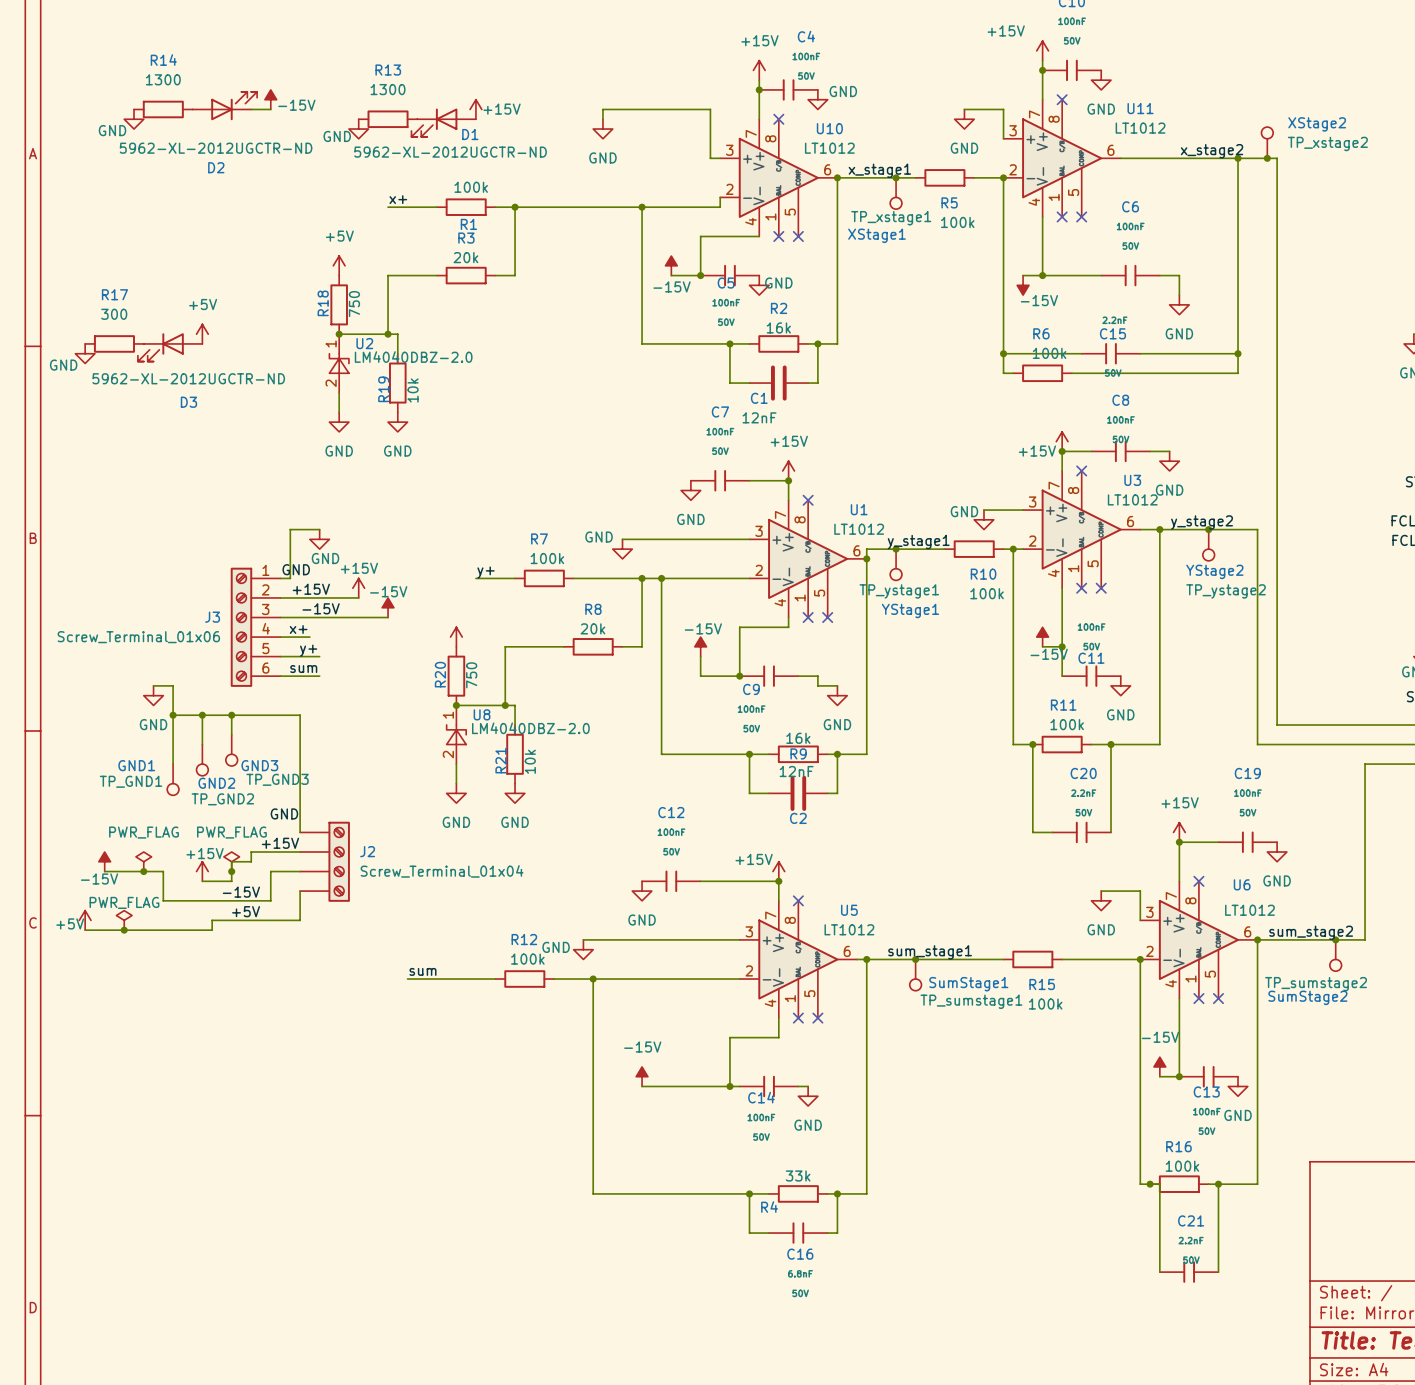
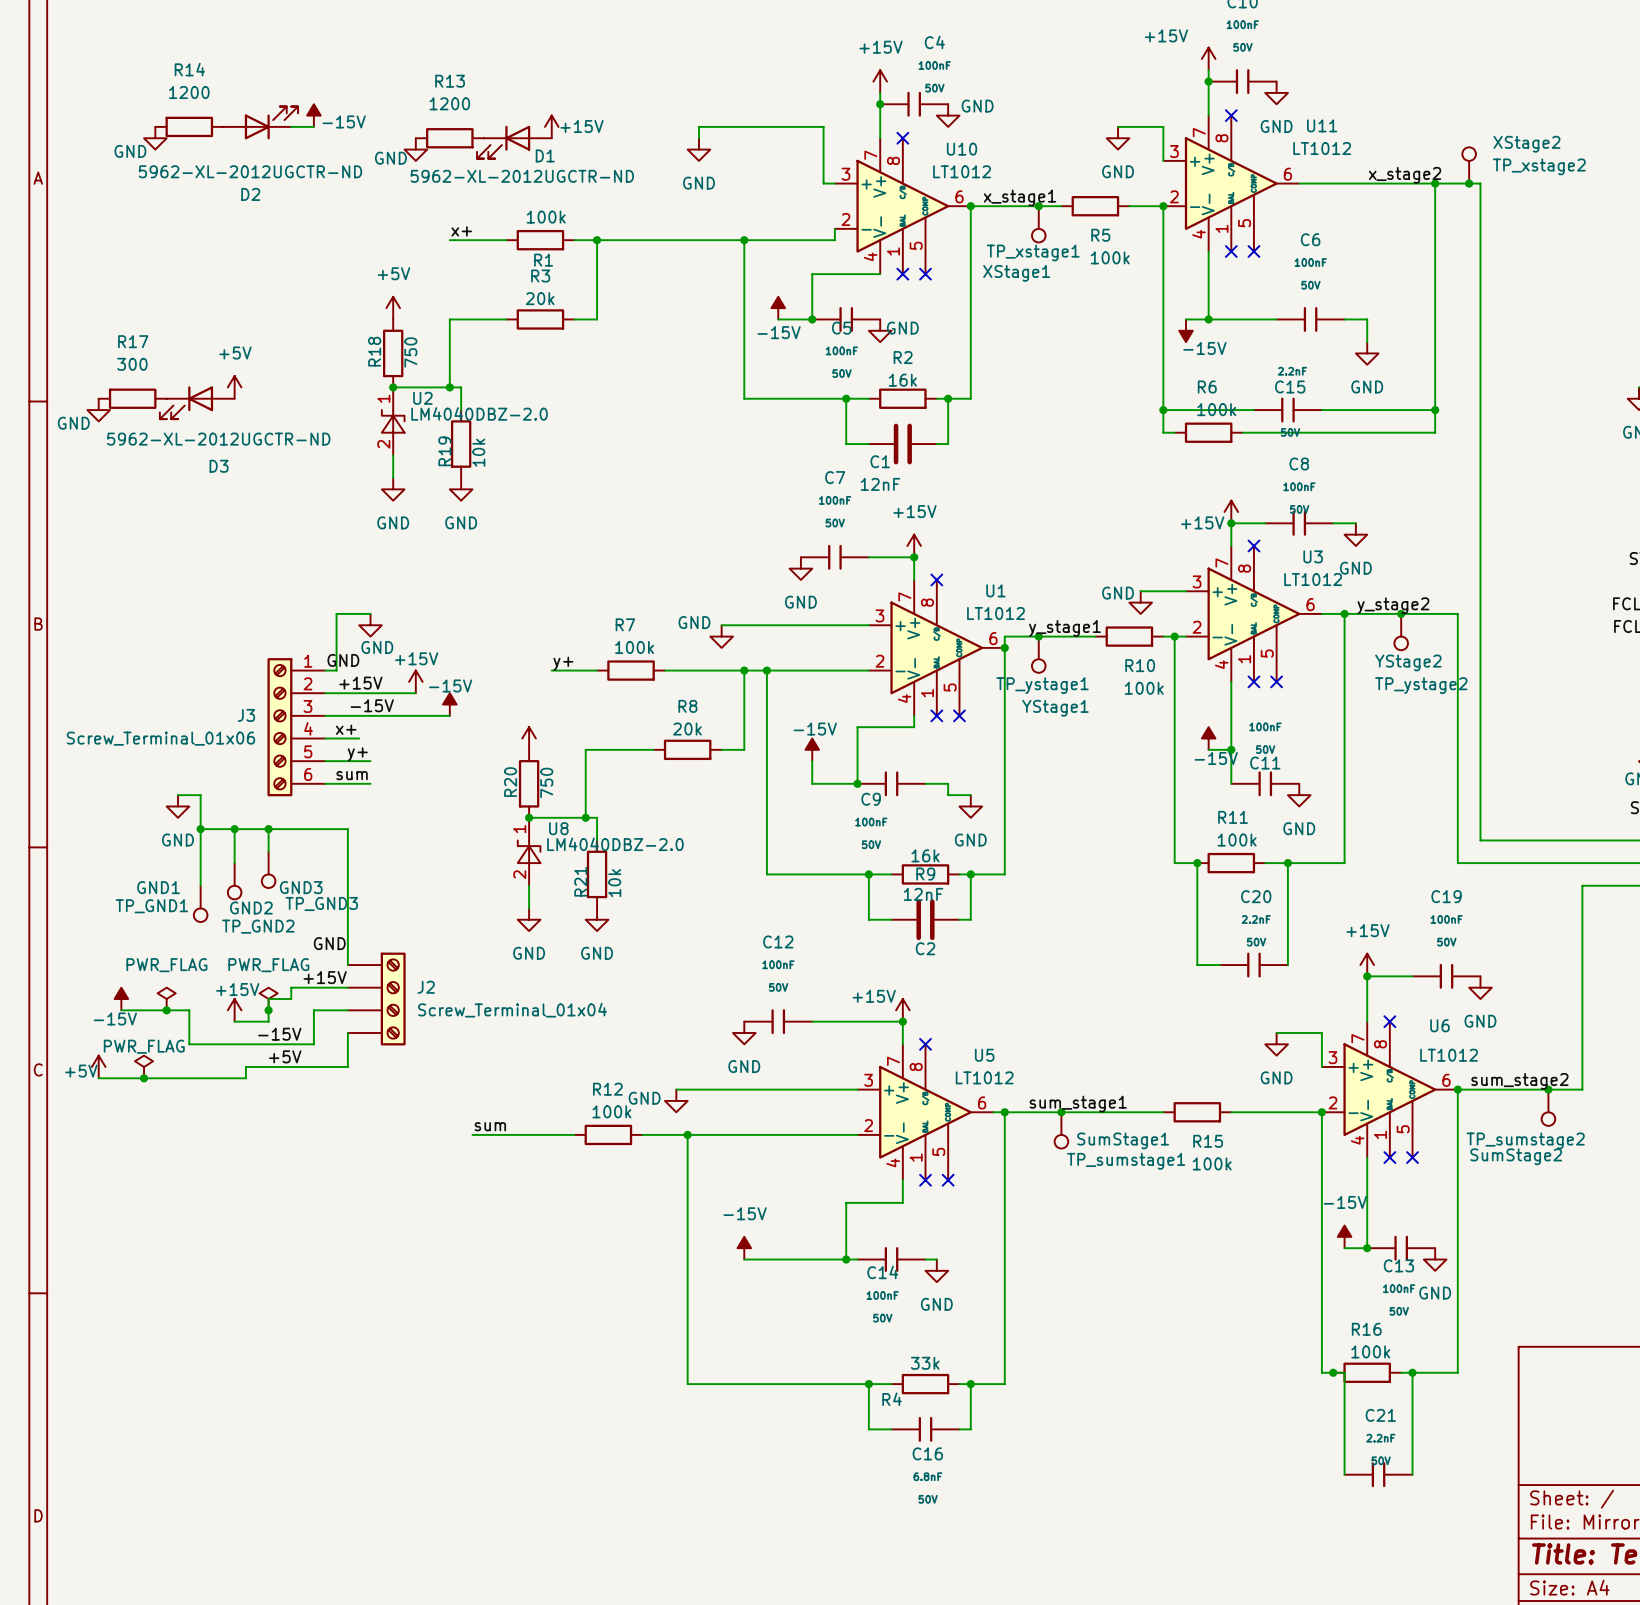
R14 value: 1300 (163, 79) -> 1200 (189, 92)
R13 value: 1300 (388, 89) -> 1200 (449, 103)

